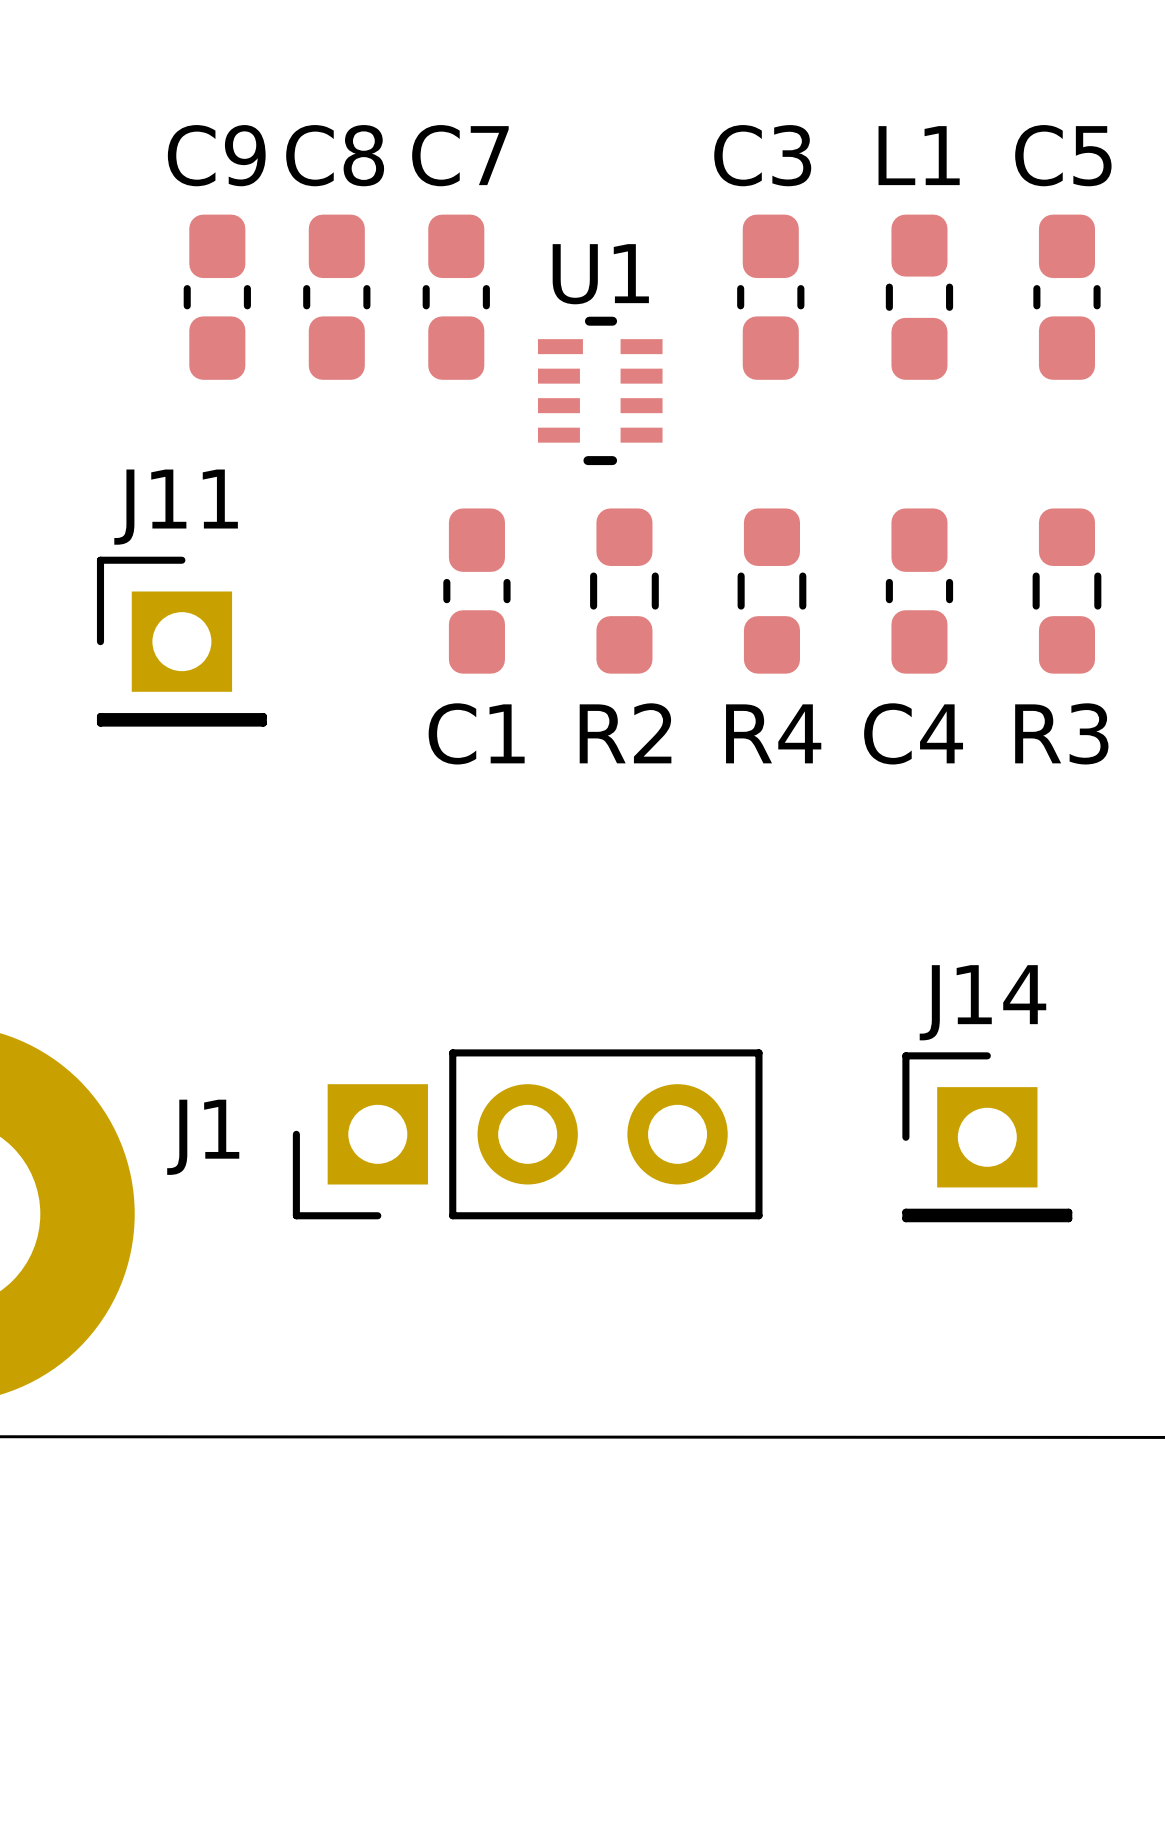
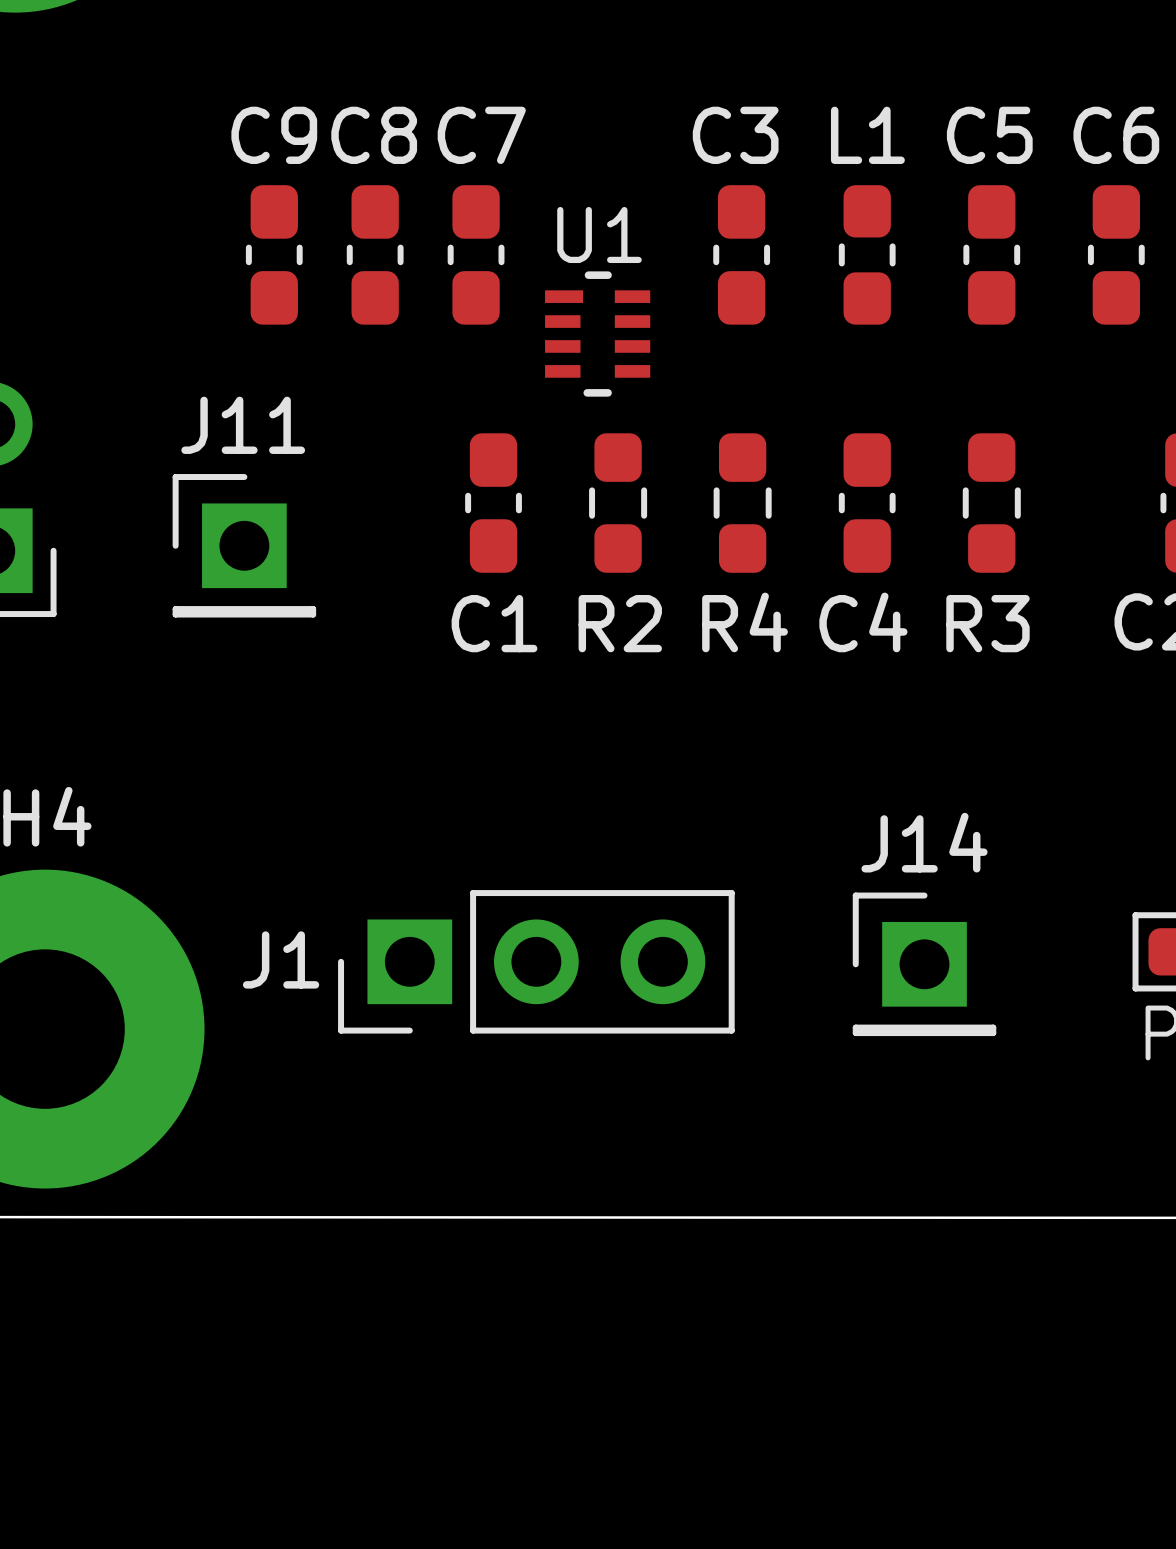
J1 name position: J1 (203, 1137) -> J1 (281, 959)

